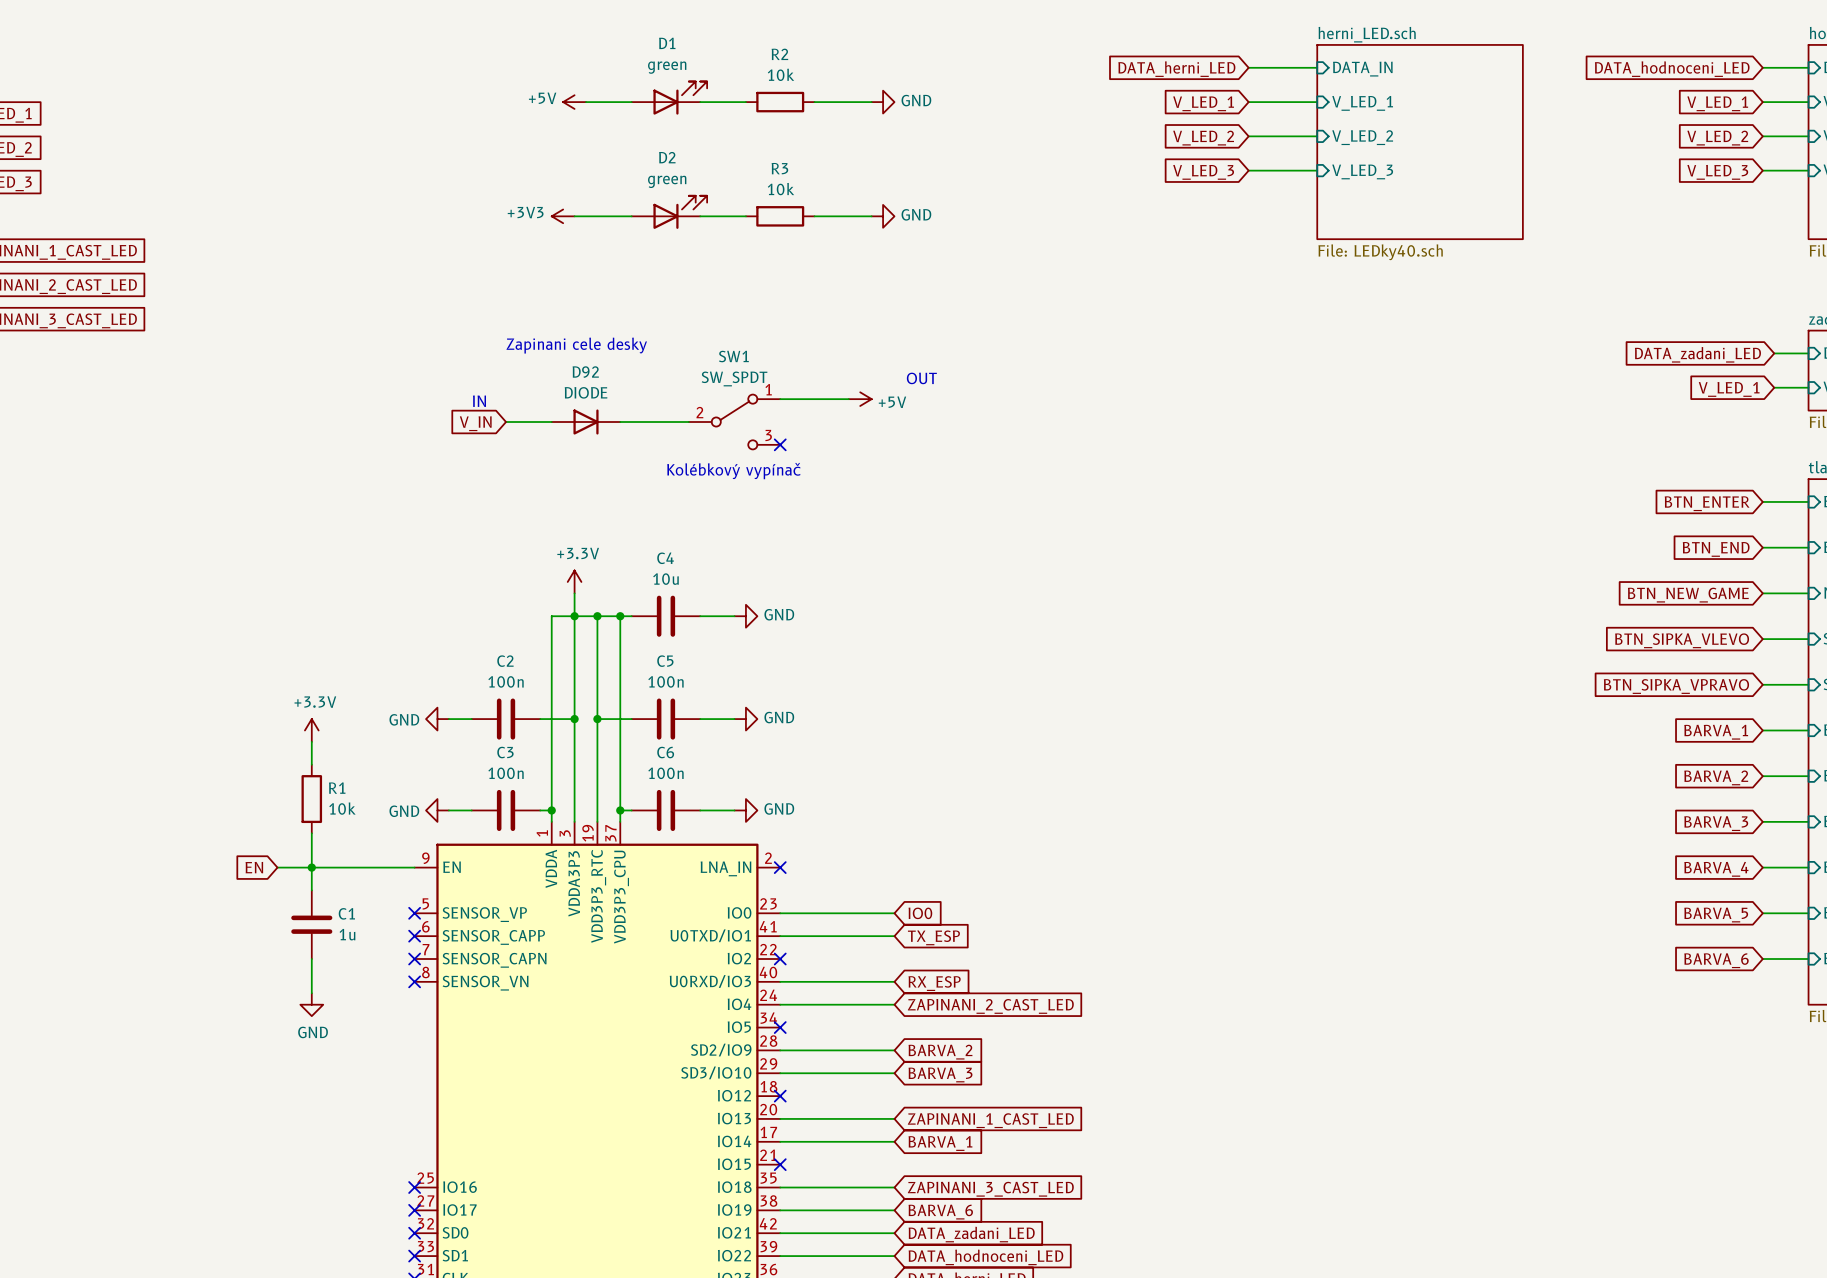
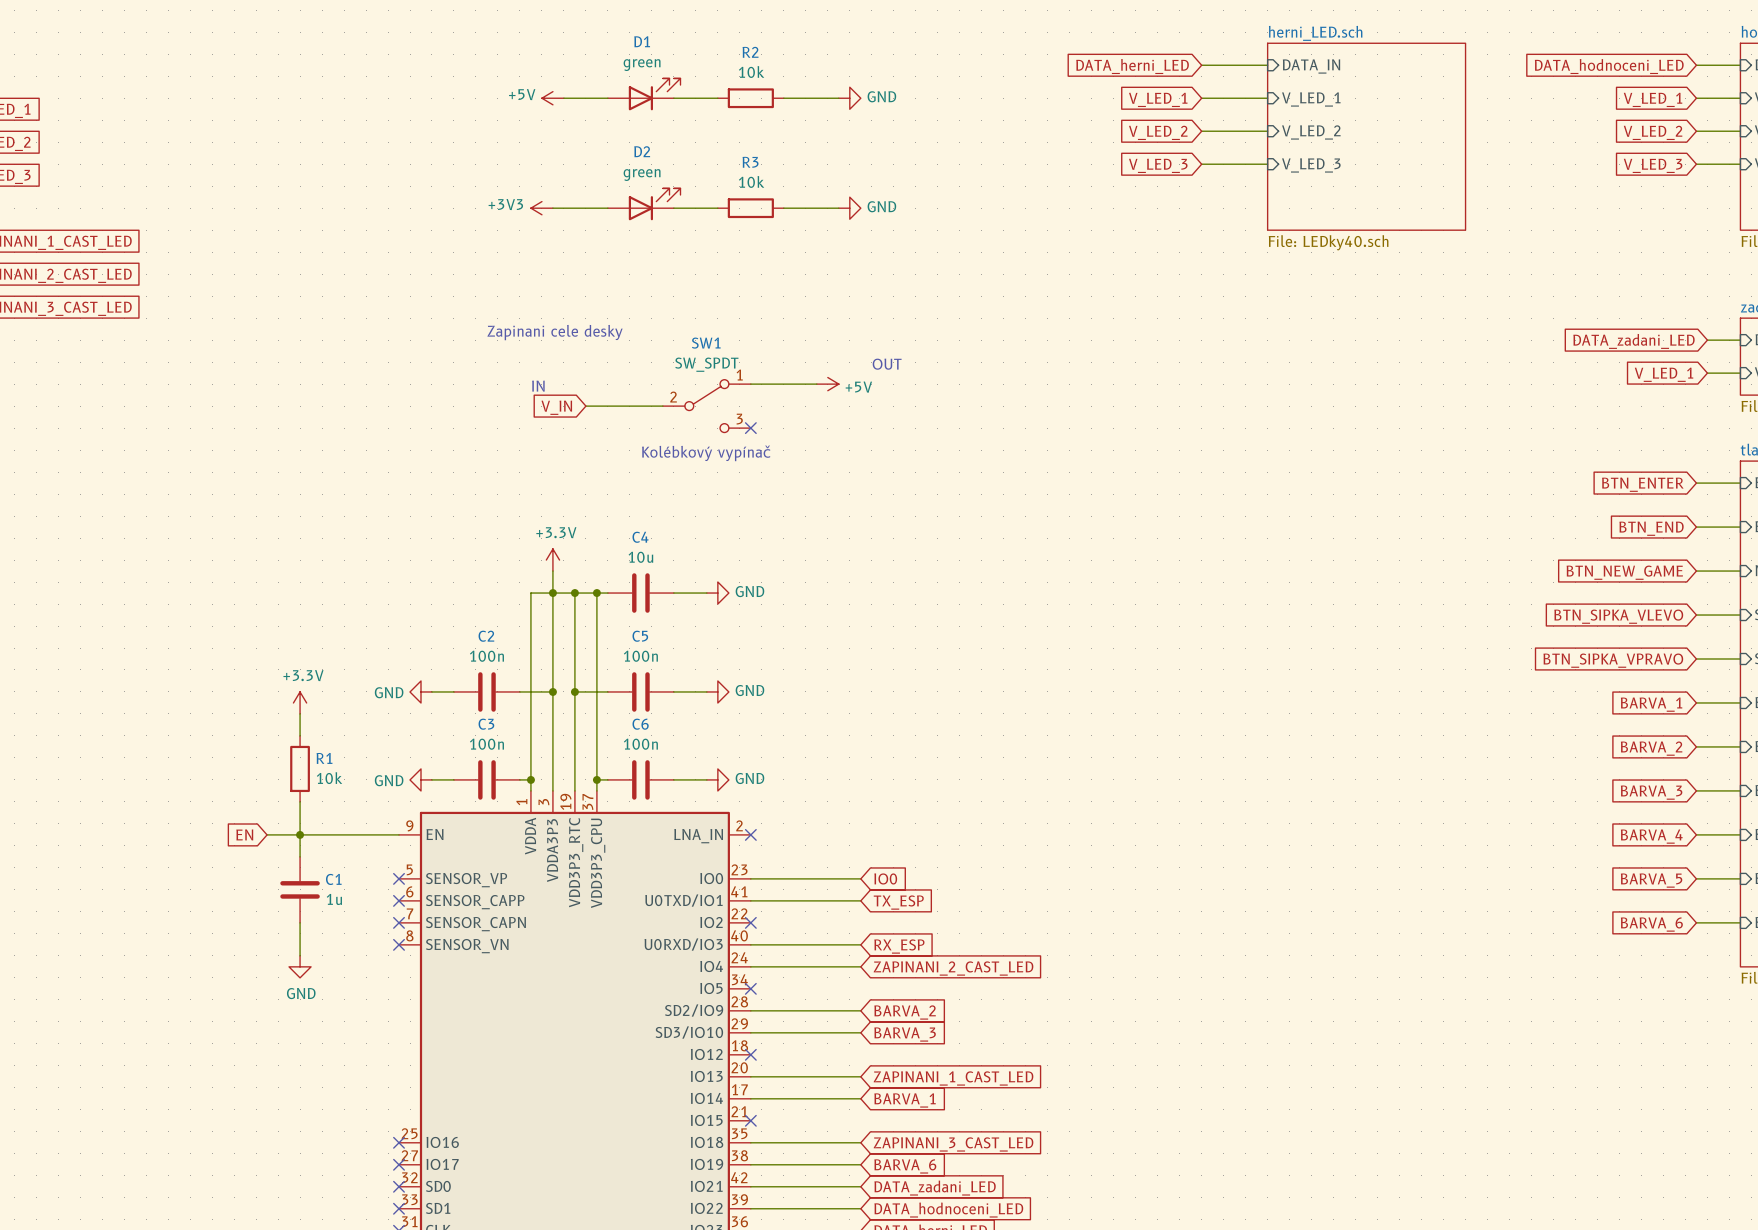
text position: IN (479, 401) -> IN (538, 386)
wire: (506, 422) (551, 422) -> none
D92: DIODE (586, 422) -> none
global label position: V_IN (475, 423) -> V_IN (556, 407)

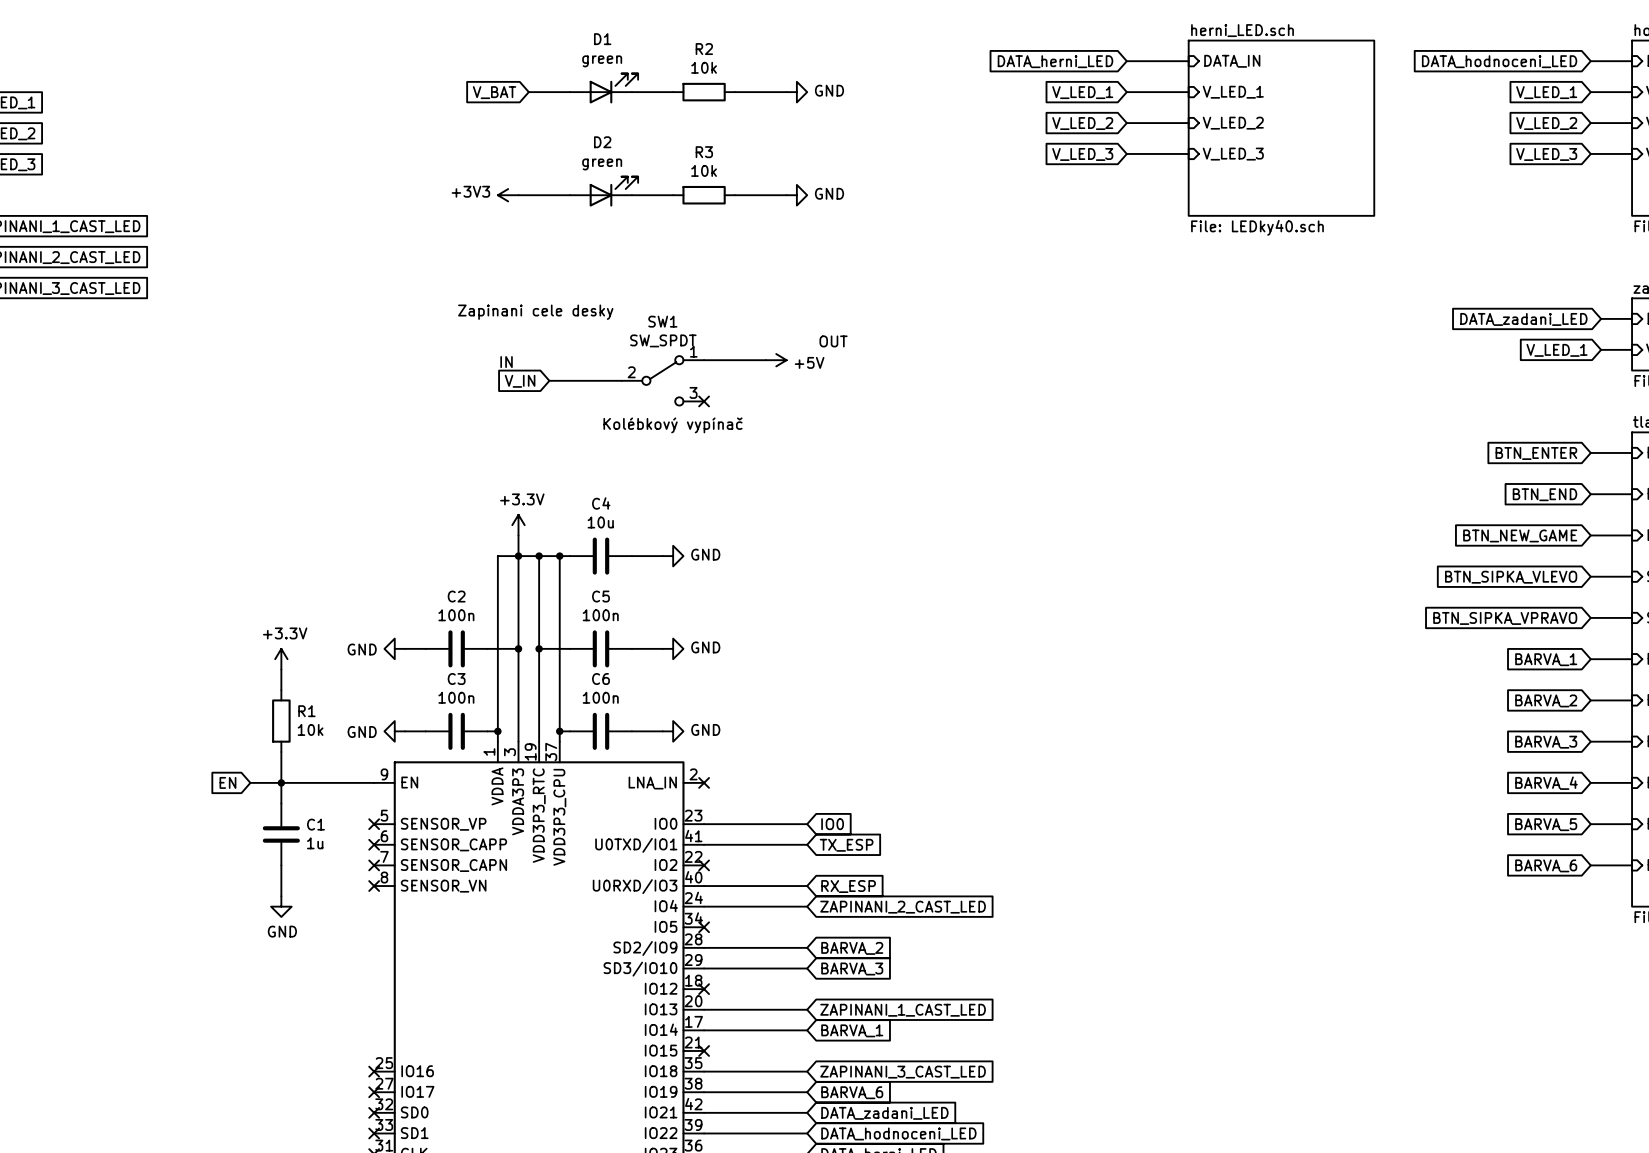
power symbol: +5V (552, 98) -> none
global label: none -> V_BAT (494, 92)

